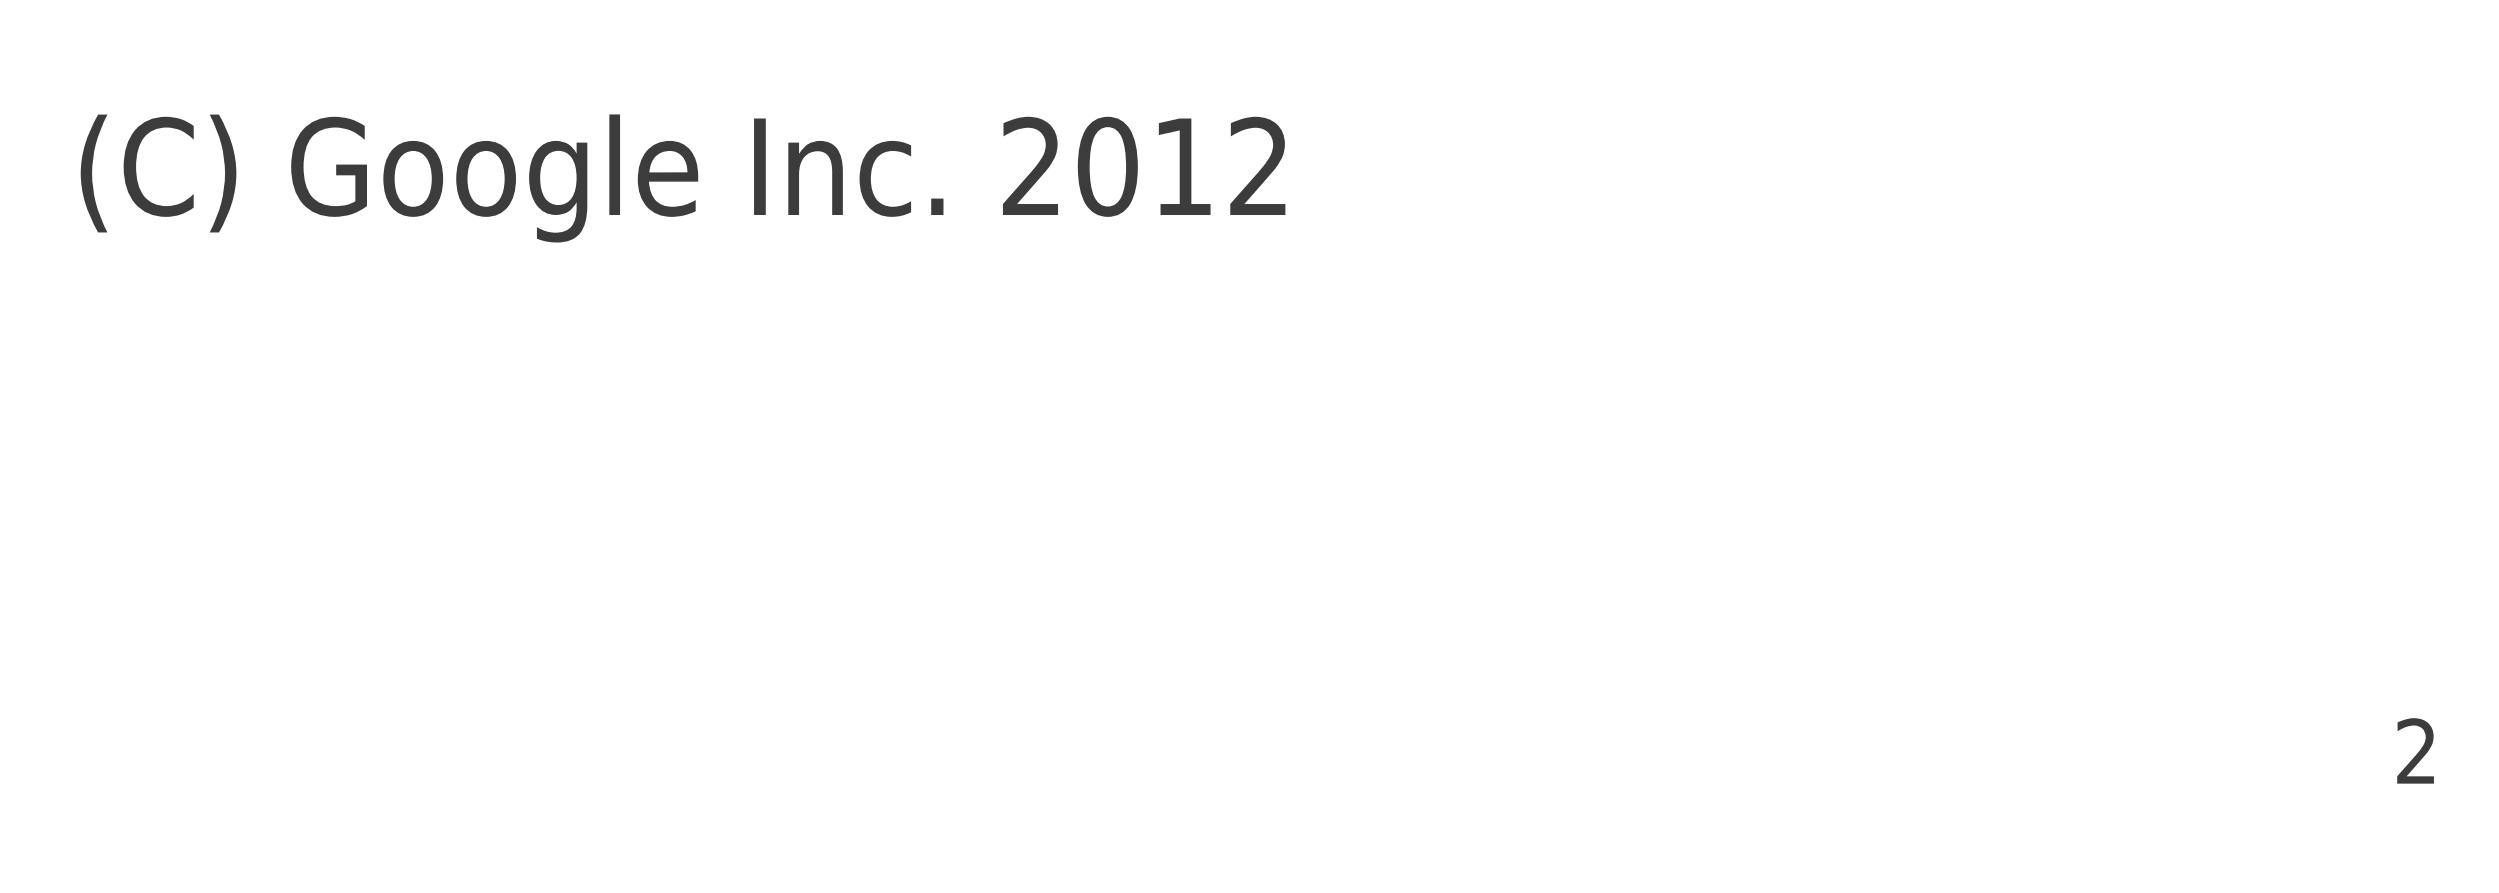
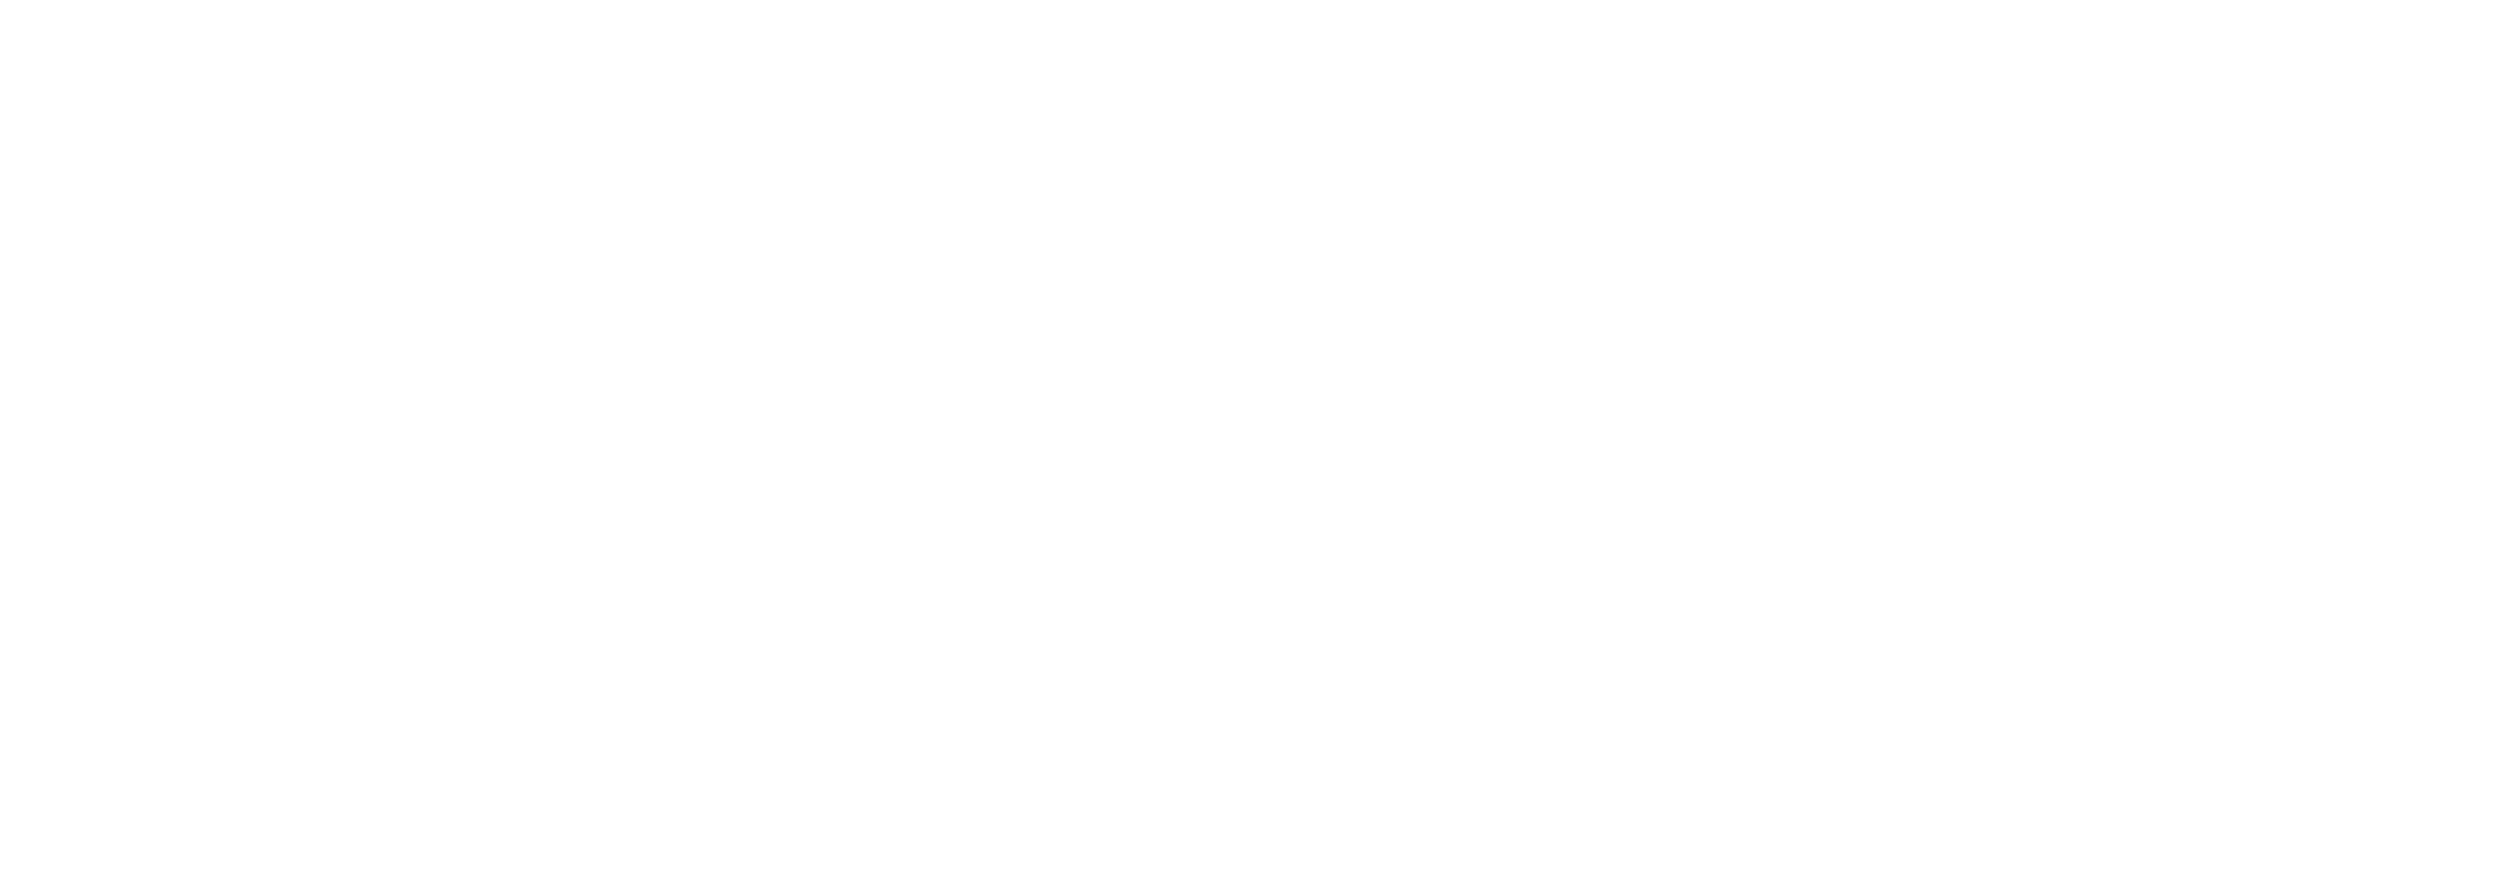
text: (C) Google Inc. 2012 (683, 178) -> none
text: 2 (2415, 750) -> none

